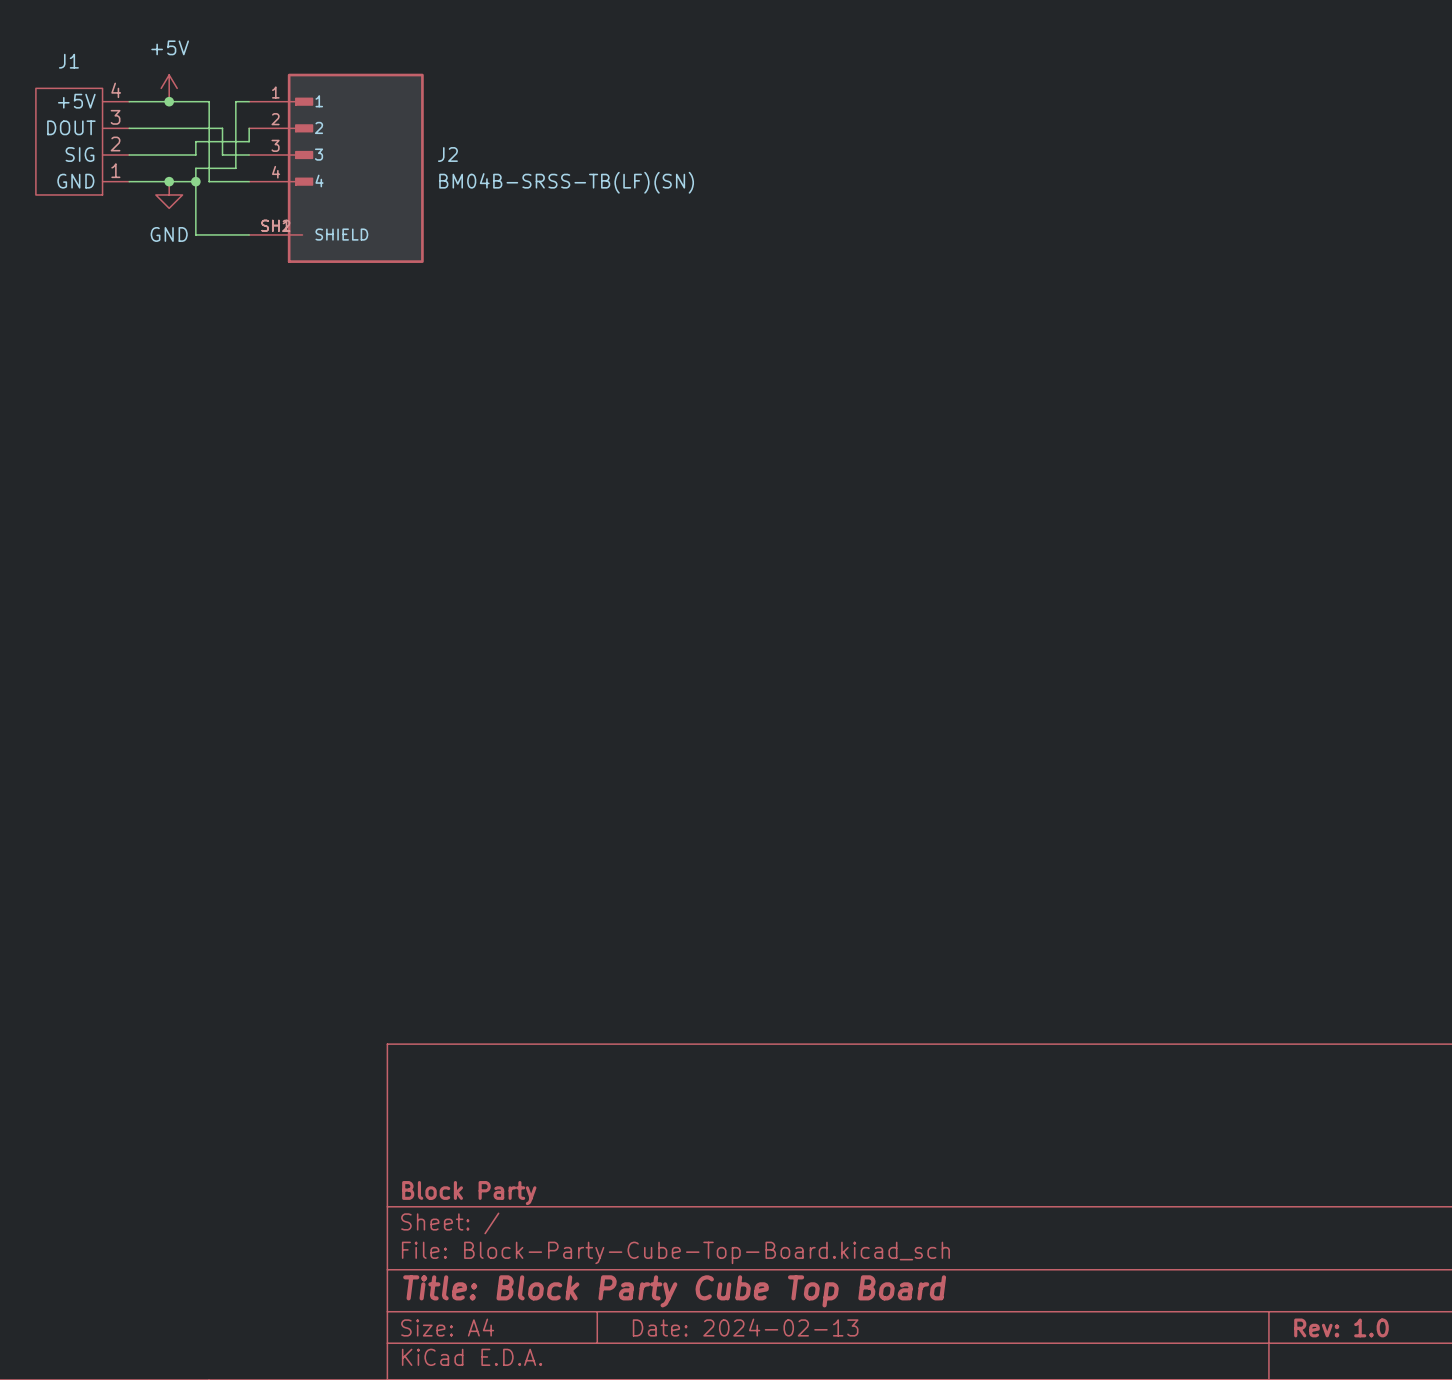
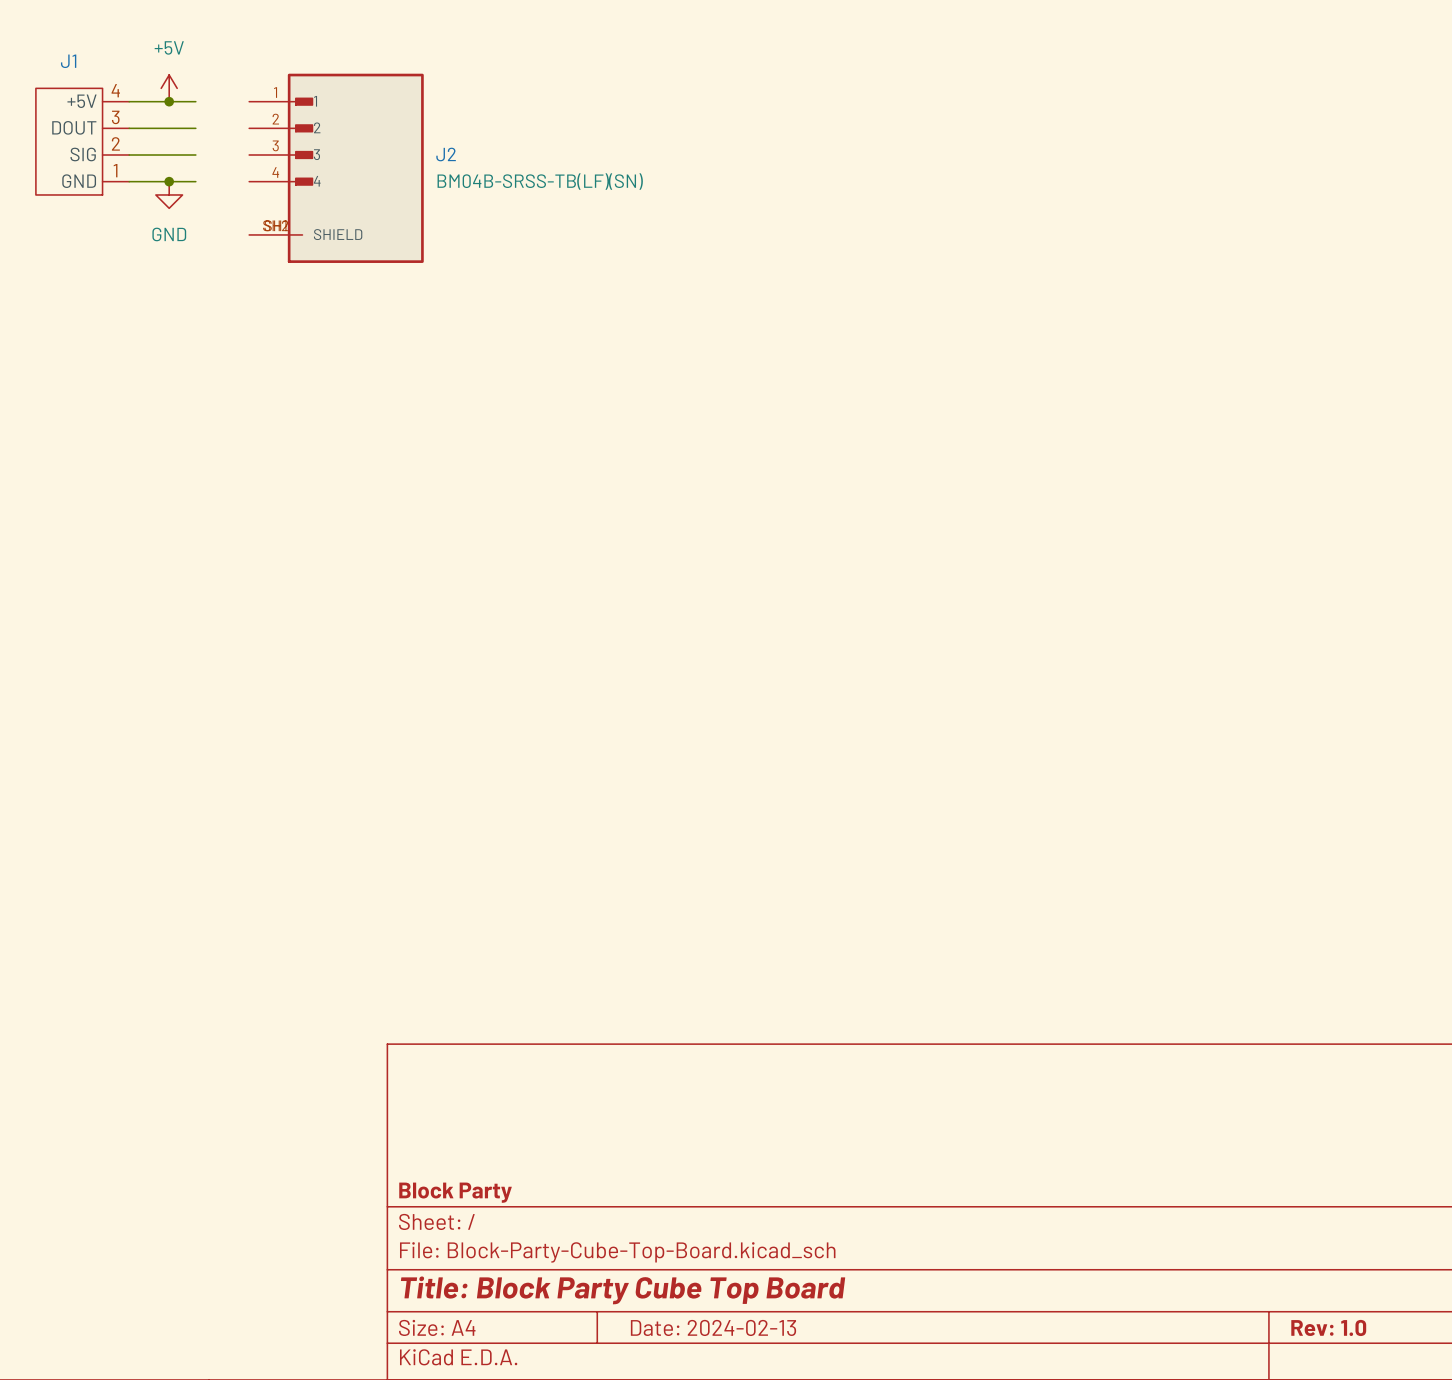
wire: (195, 101) (209, 101) (209, 181) (249, 181) -> none
wire: (249, 101) (235, 101) (235, 168) (195, 168) (195, 234) (249, 234) -> none
wire: (195, 128) (222, 128) (222, 155) (249, 155) -> none
wire: (249, 128) (249, 141) (195, 141) (195, 155) -> none
junction: (195, 181) -> none

